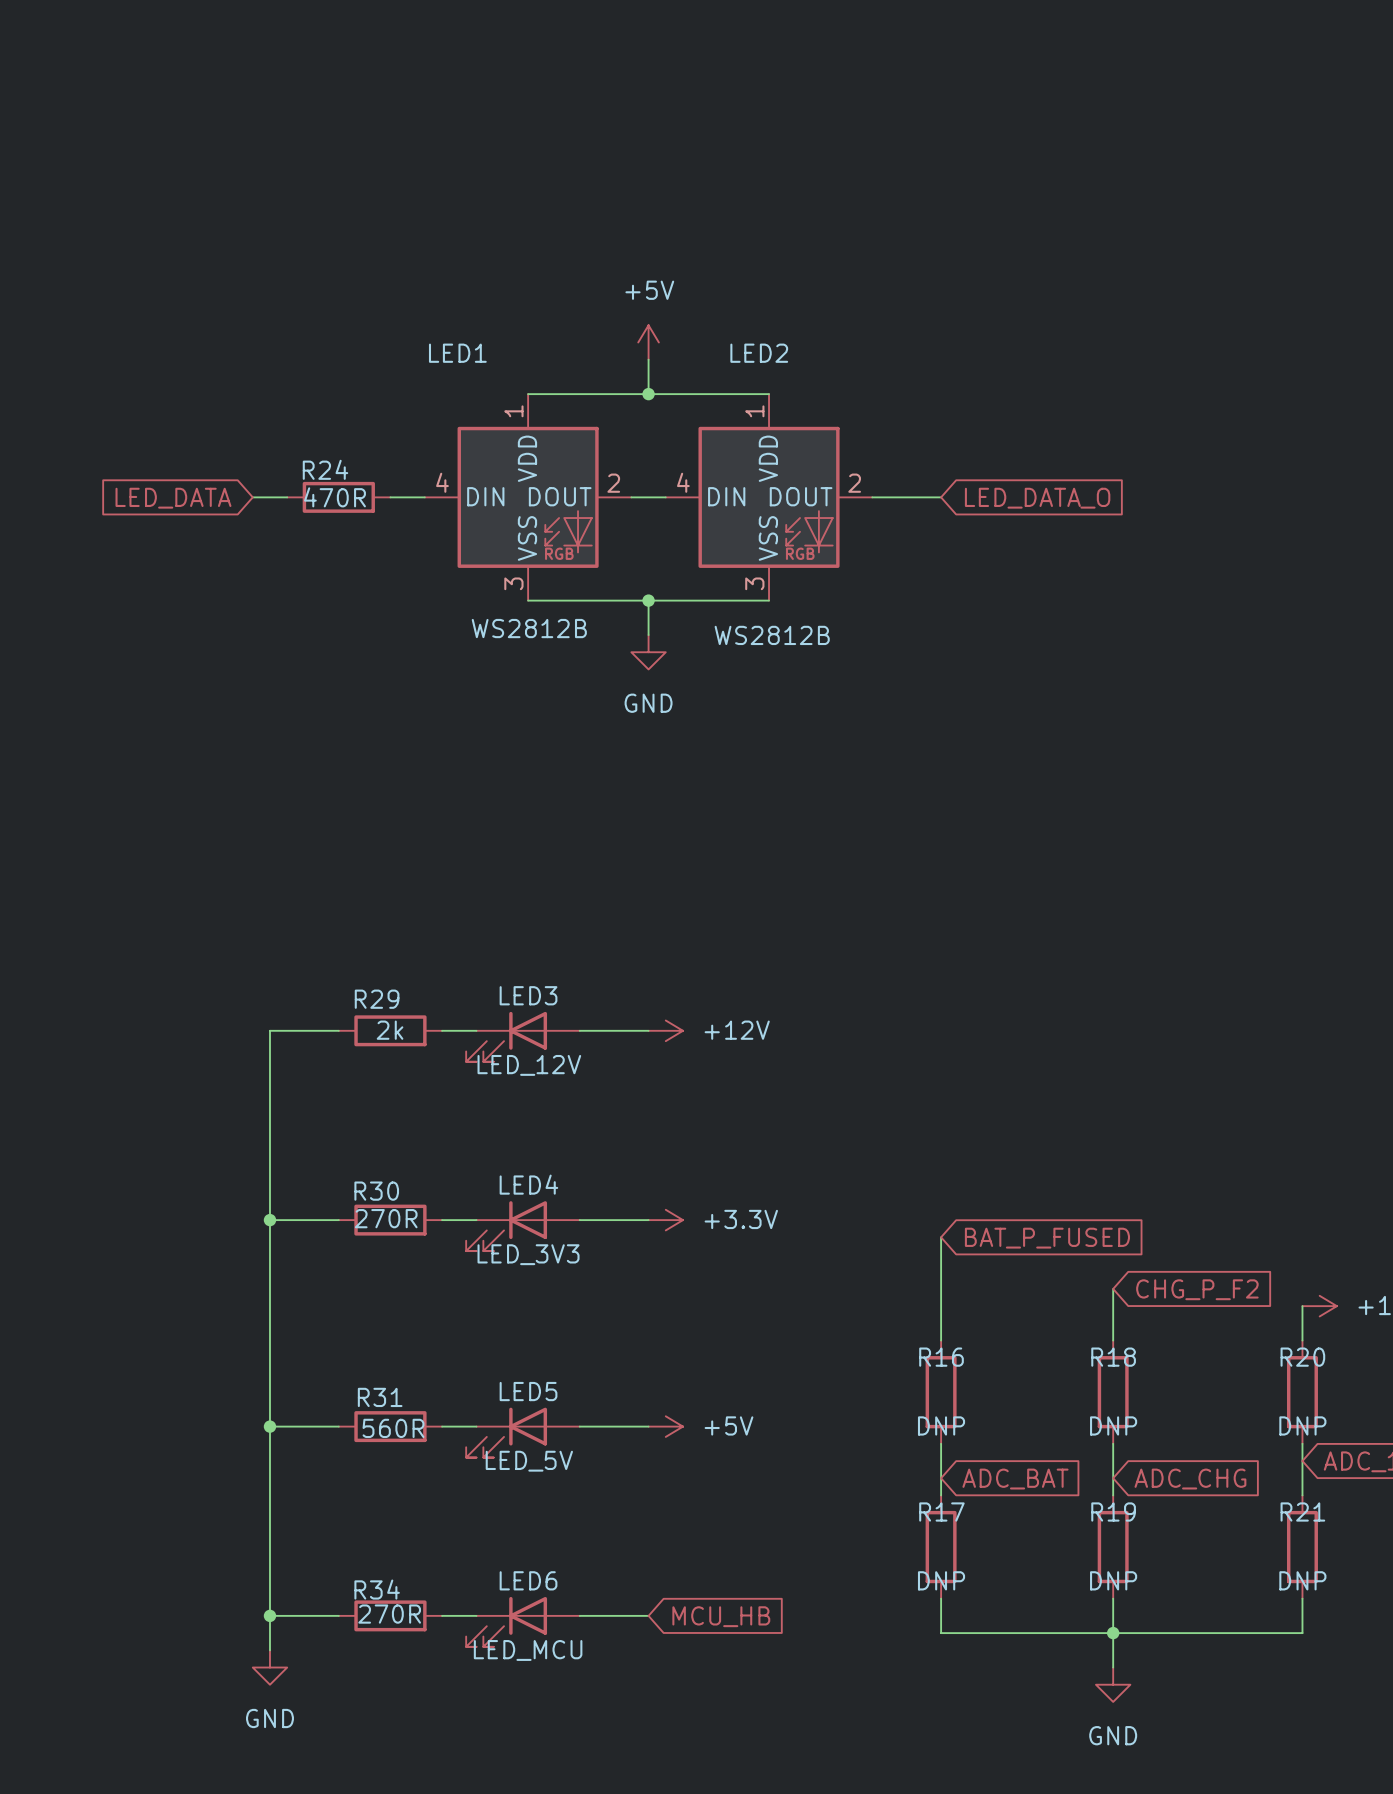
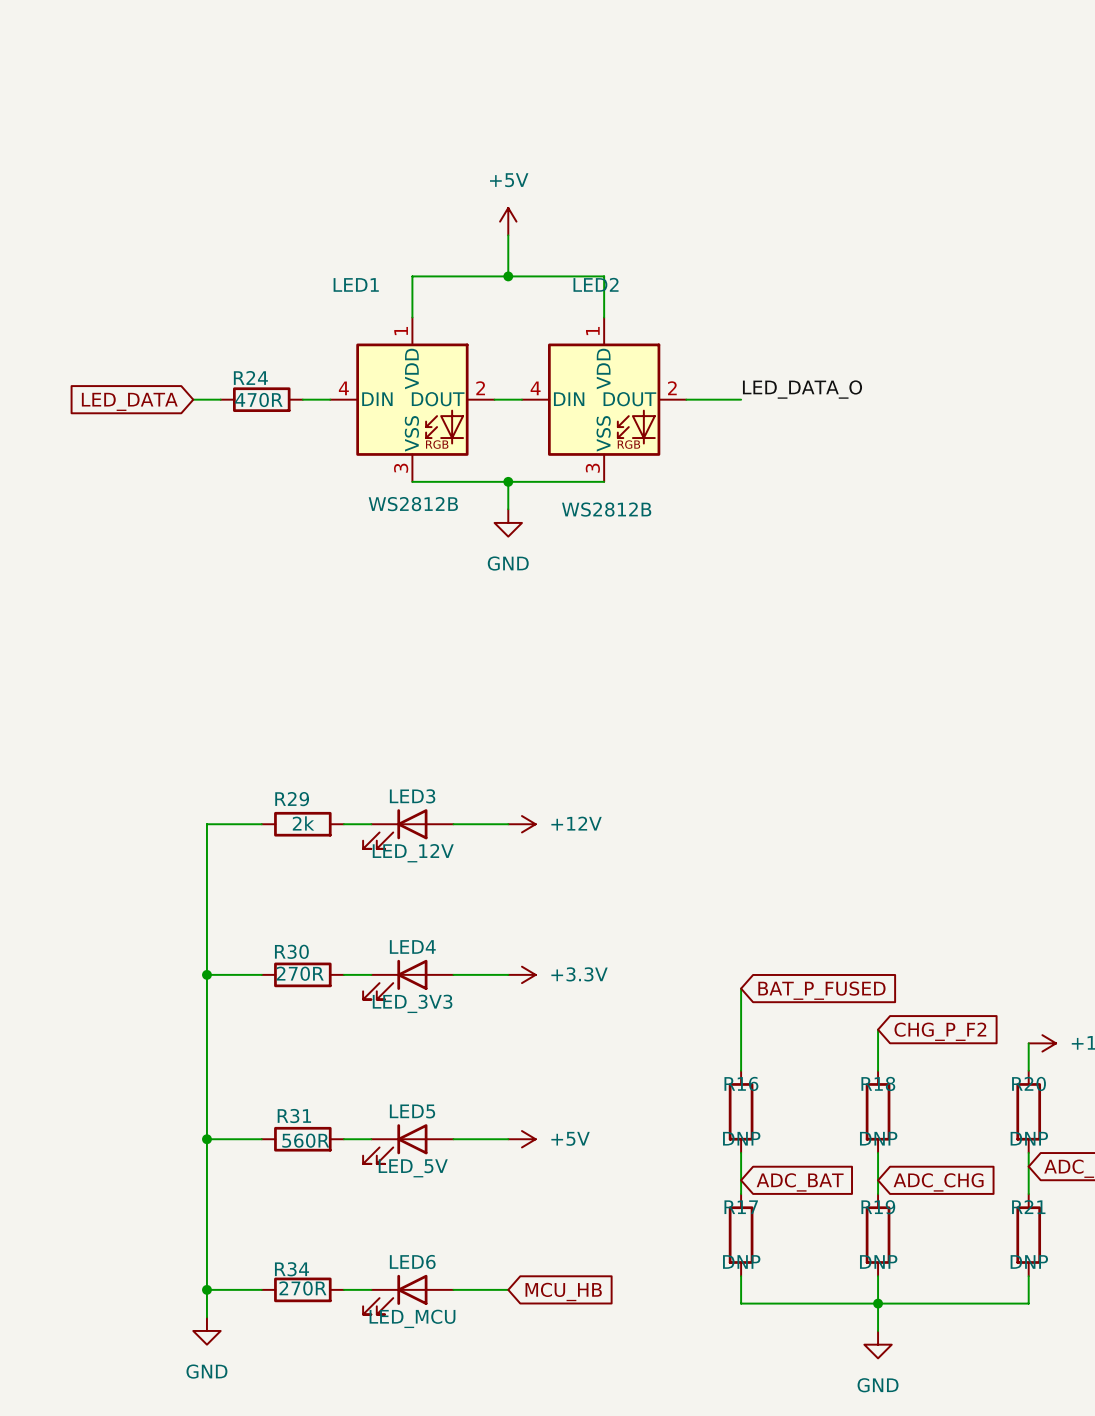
wire: none -> (508, 235) (508, 276)
power symbol position: +5V (648, 342) -> +5V (508, 221)
wire: (648, 359) (648, 394) -> none
wire: (528, 394) (769, 394) -> (412, 317) (412, 276) (604, 276) (604, 317)
junction position: (648, 394) -> (508, 276)
label: none -> LED_DATA_O (802, 389)
global label: LED_DATA_O (1037, 498) -> none

